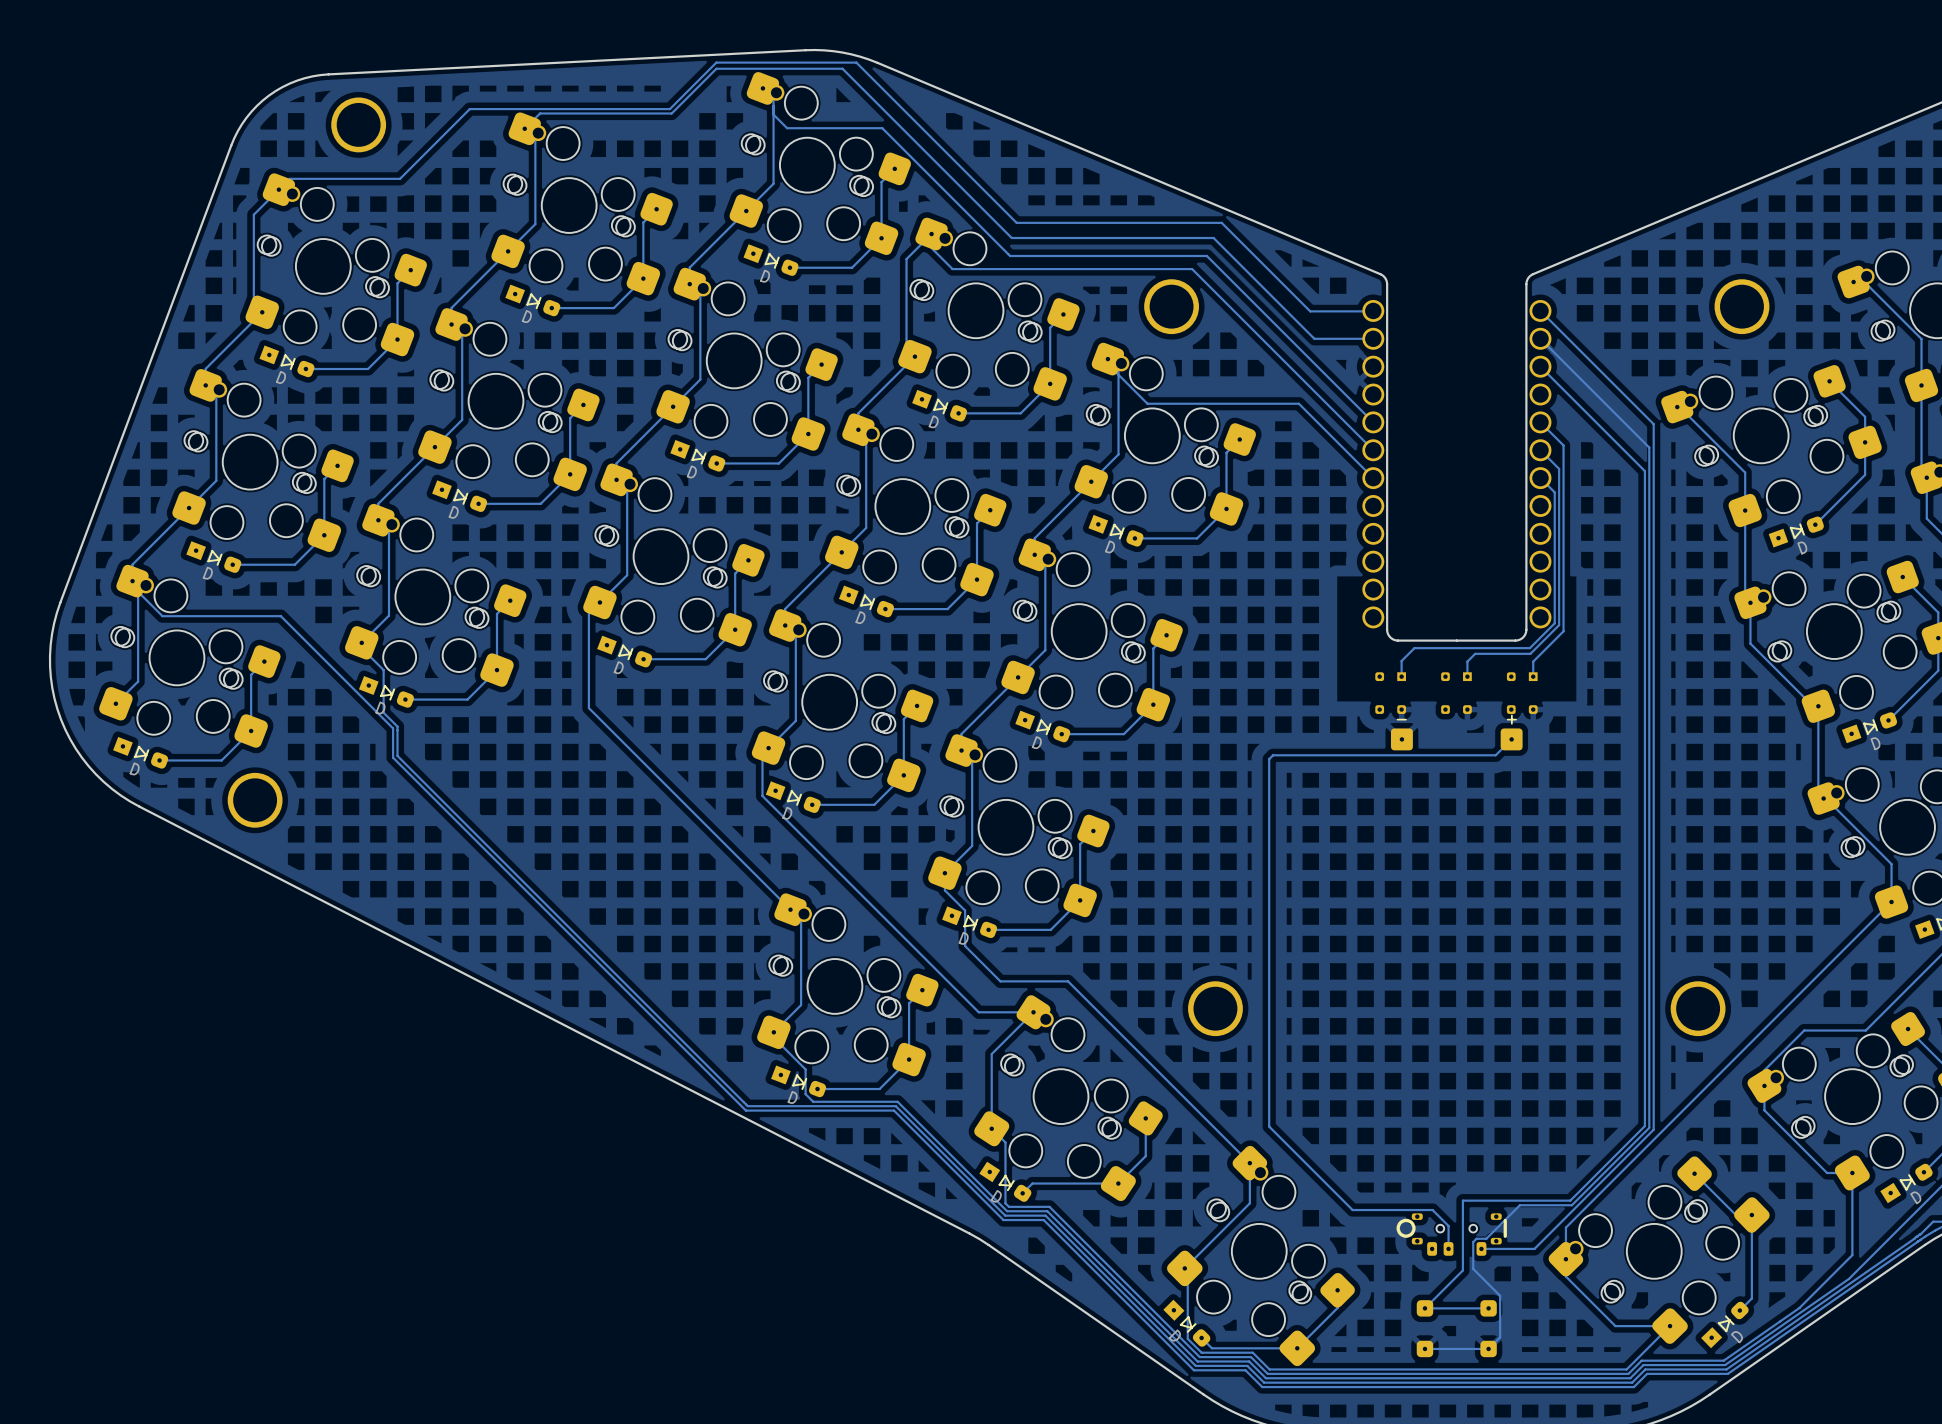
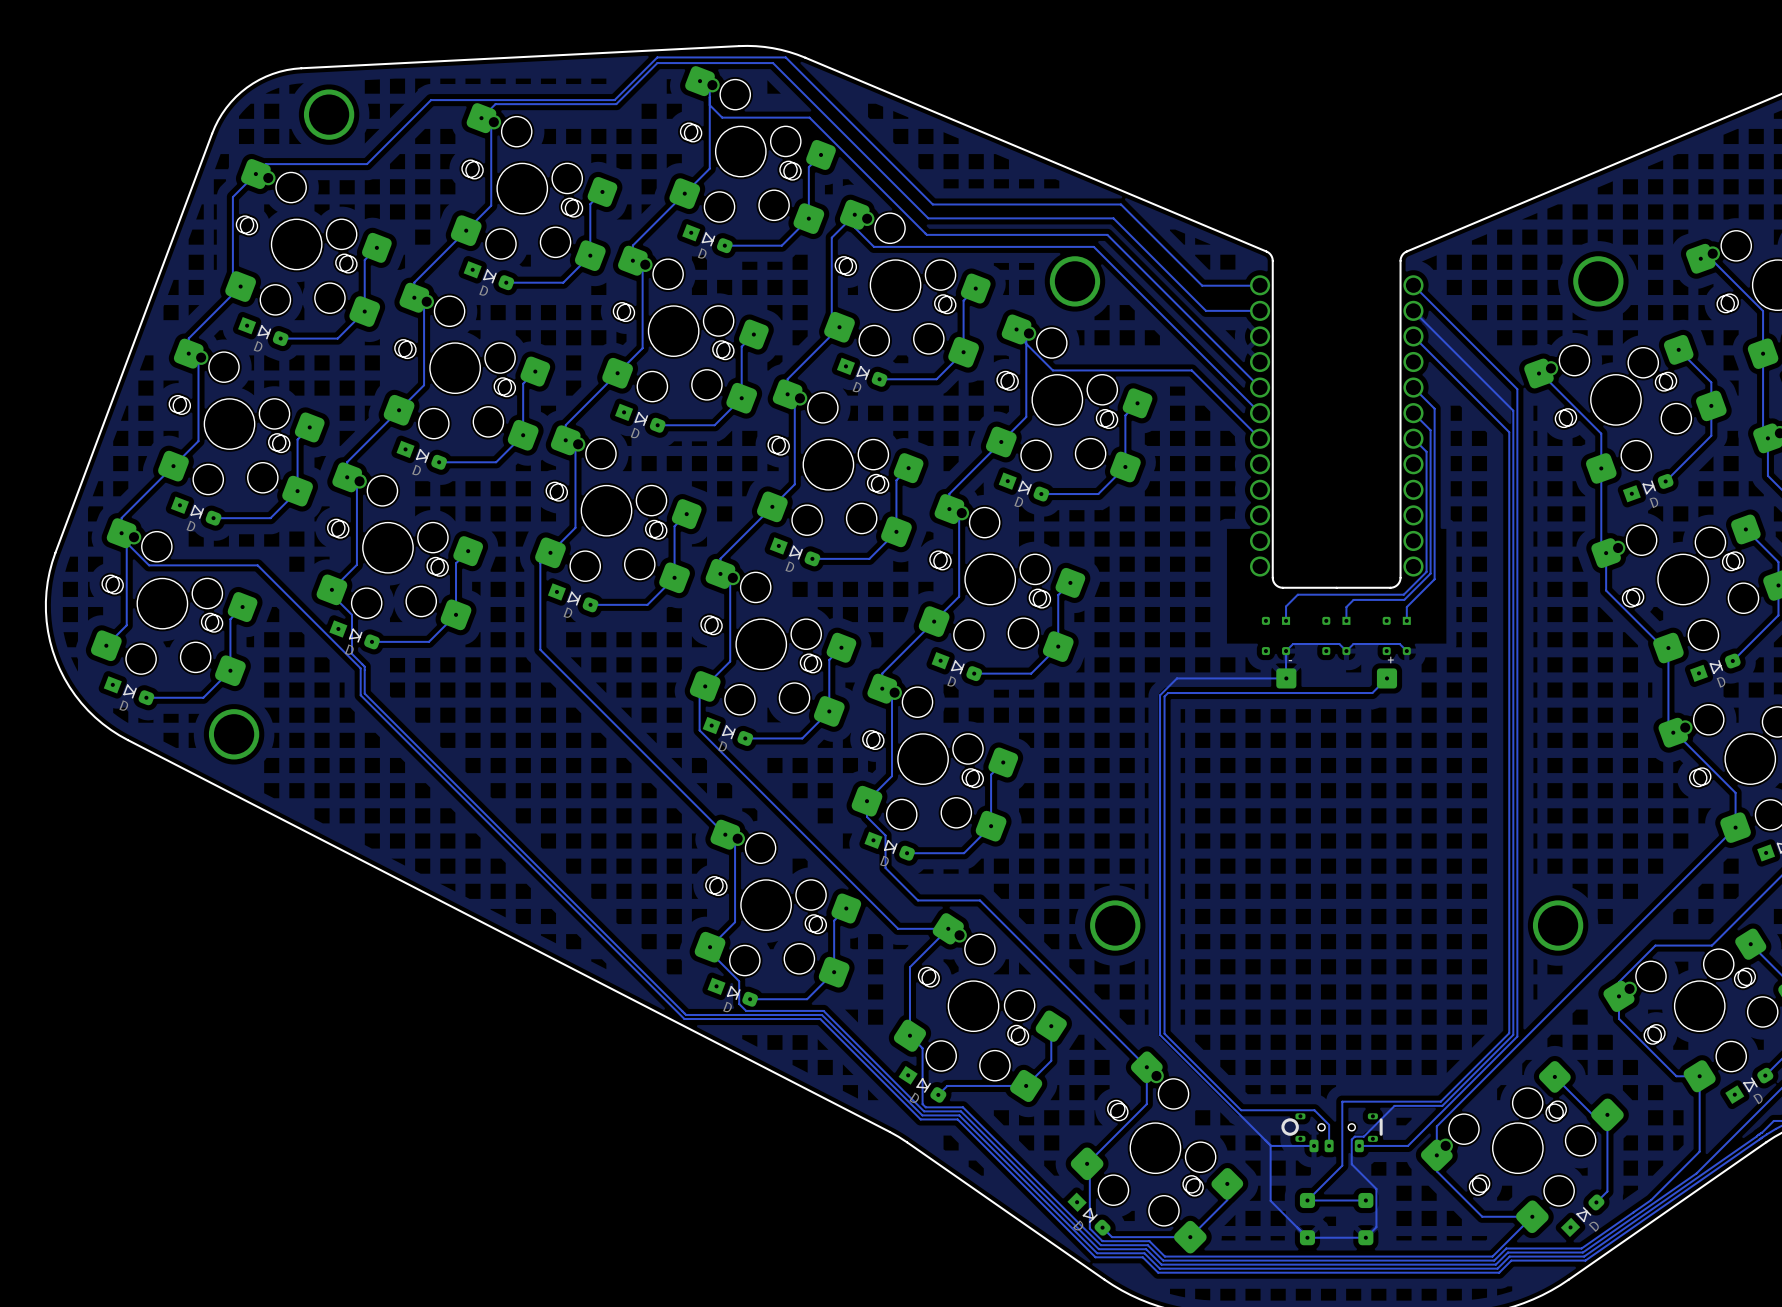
track: none -> (1406, 651) (1399, 644) (1353, 644) (1346, 651) (1339, 644) (1293, 644) (1286, 651) (1286, 677)
track: none -> (1286, 678) (1176, 678) (1160, 695) (1160, 1034) (1271, 1145) (1314, 1145)
track: none -> (1270, 1145) (1270, 1200) (1307, 1237)

